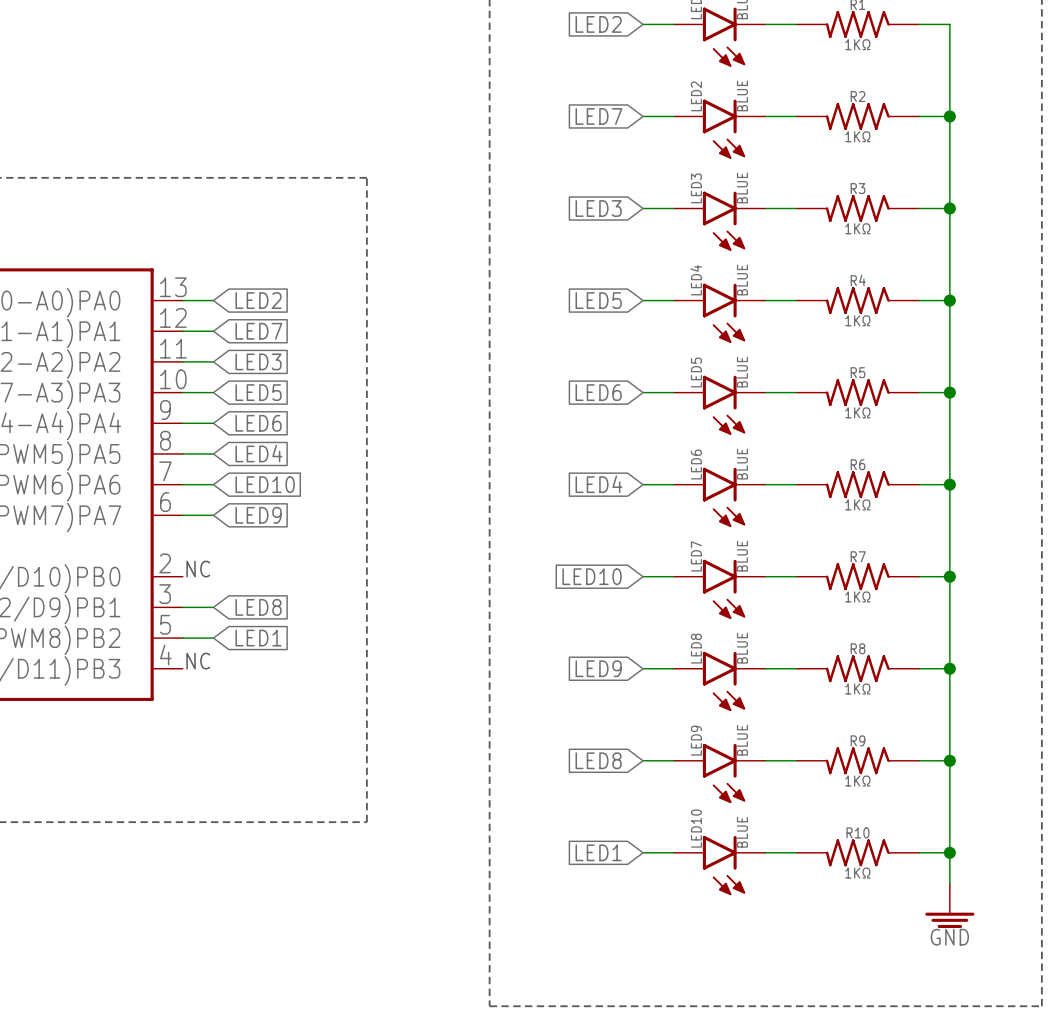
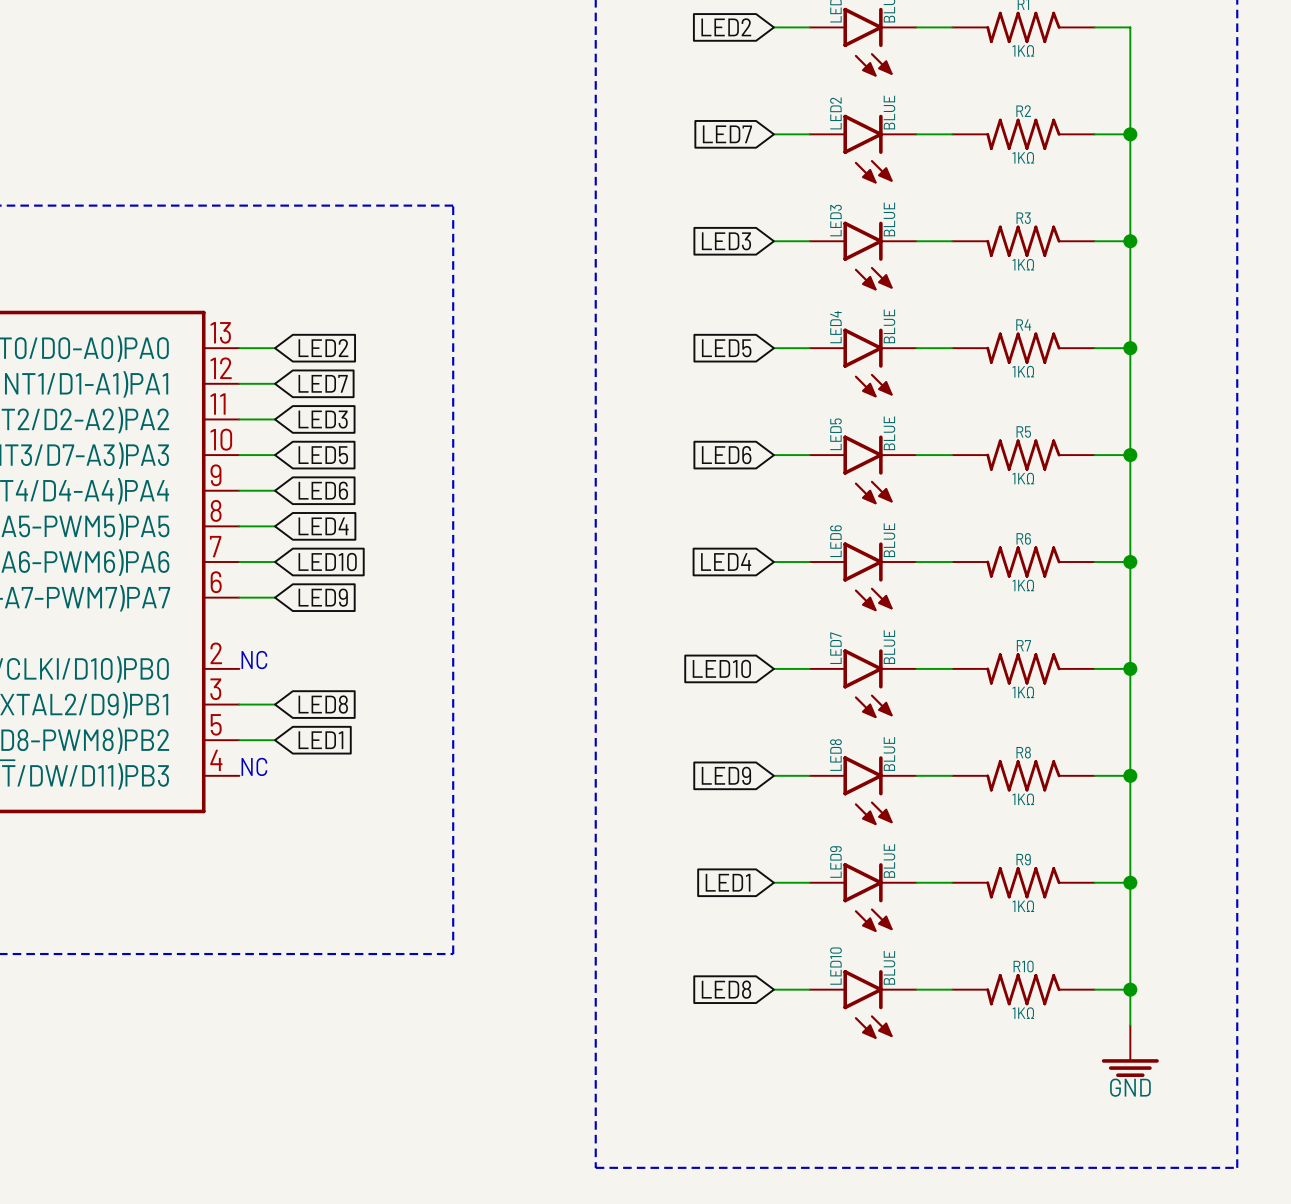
global label: LED8 (598, 760) -> LED1 (728, 882)
global label: LED1 (598, 852) -> LED8 (726, 989)

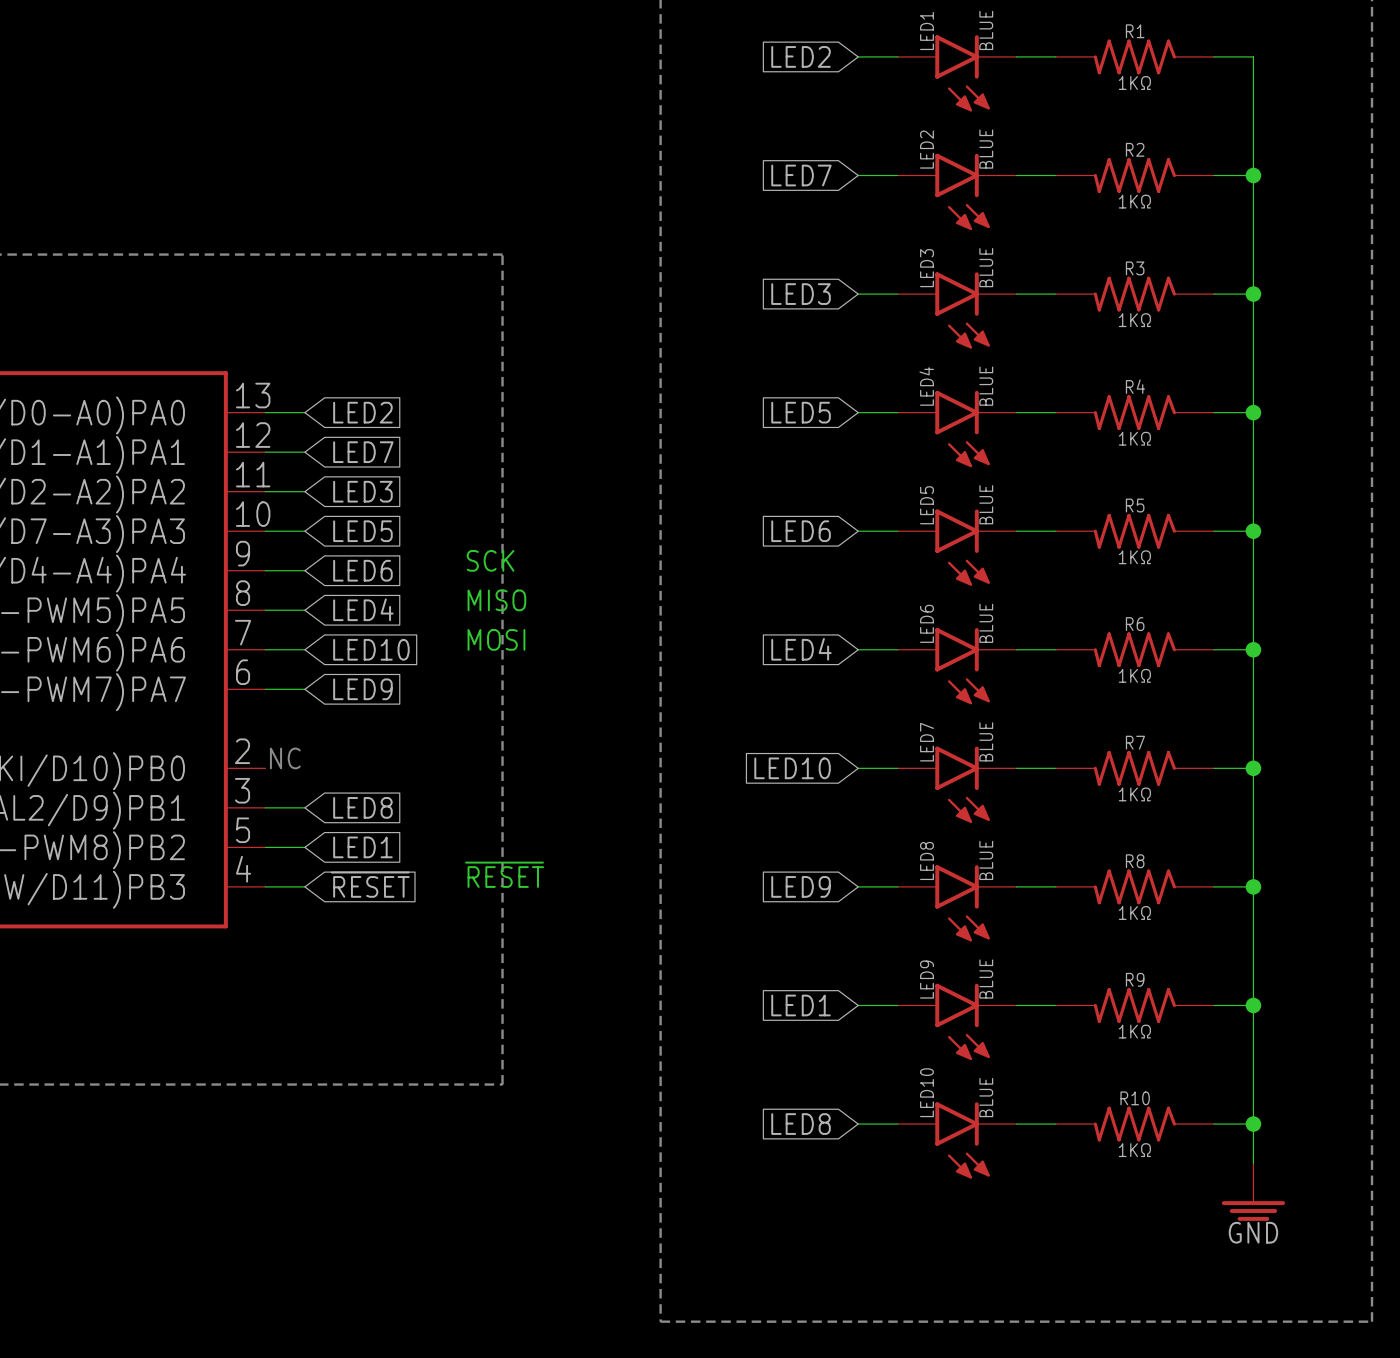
text: none -> SCK (490, 560)
text: none -> MISO (496, 600)
text: none -> MOSI (496, 639)
text: none -> ~{RESET} (504, 874)
text: NC (254, 766) -> none
global label: none -> ~{RESET} (370, 884)
wire: none -> (265, 886) (304, 886)

